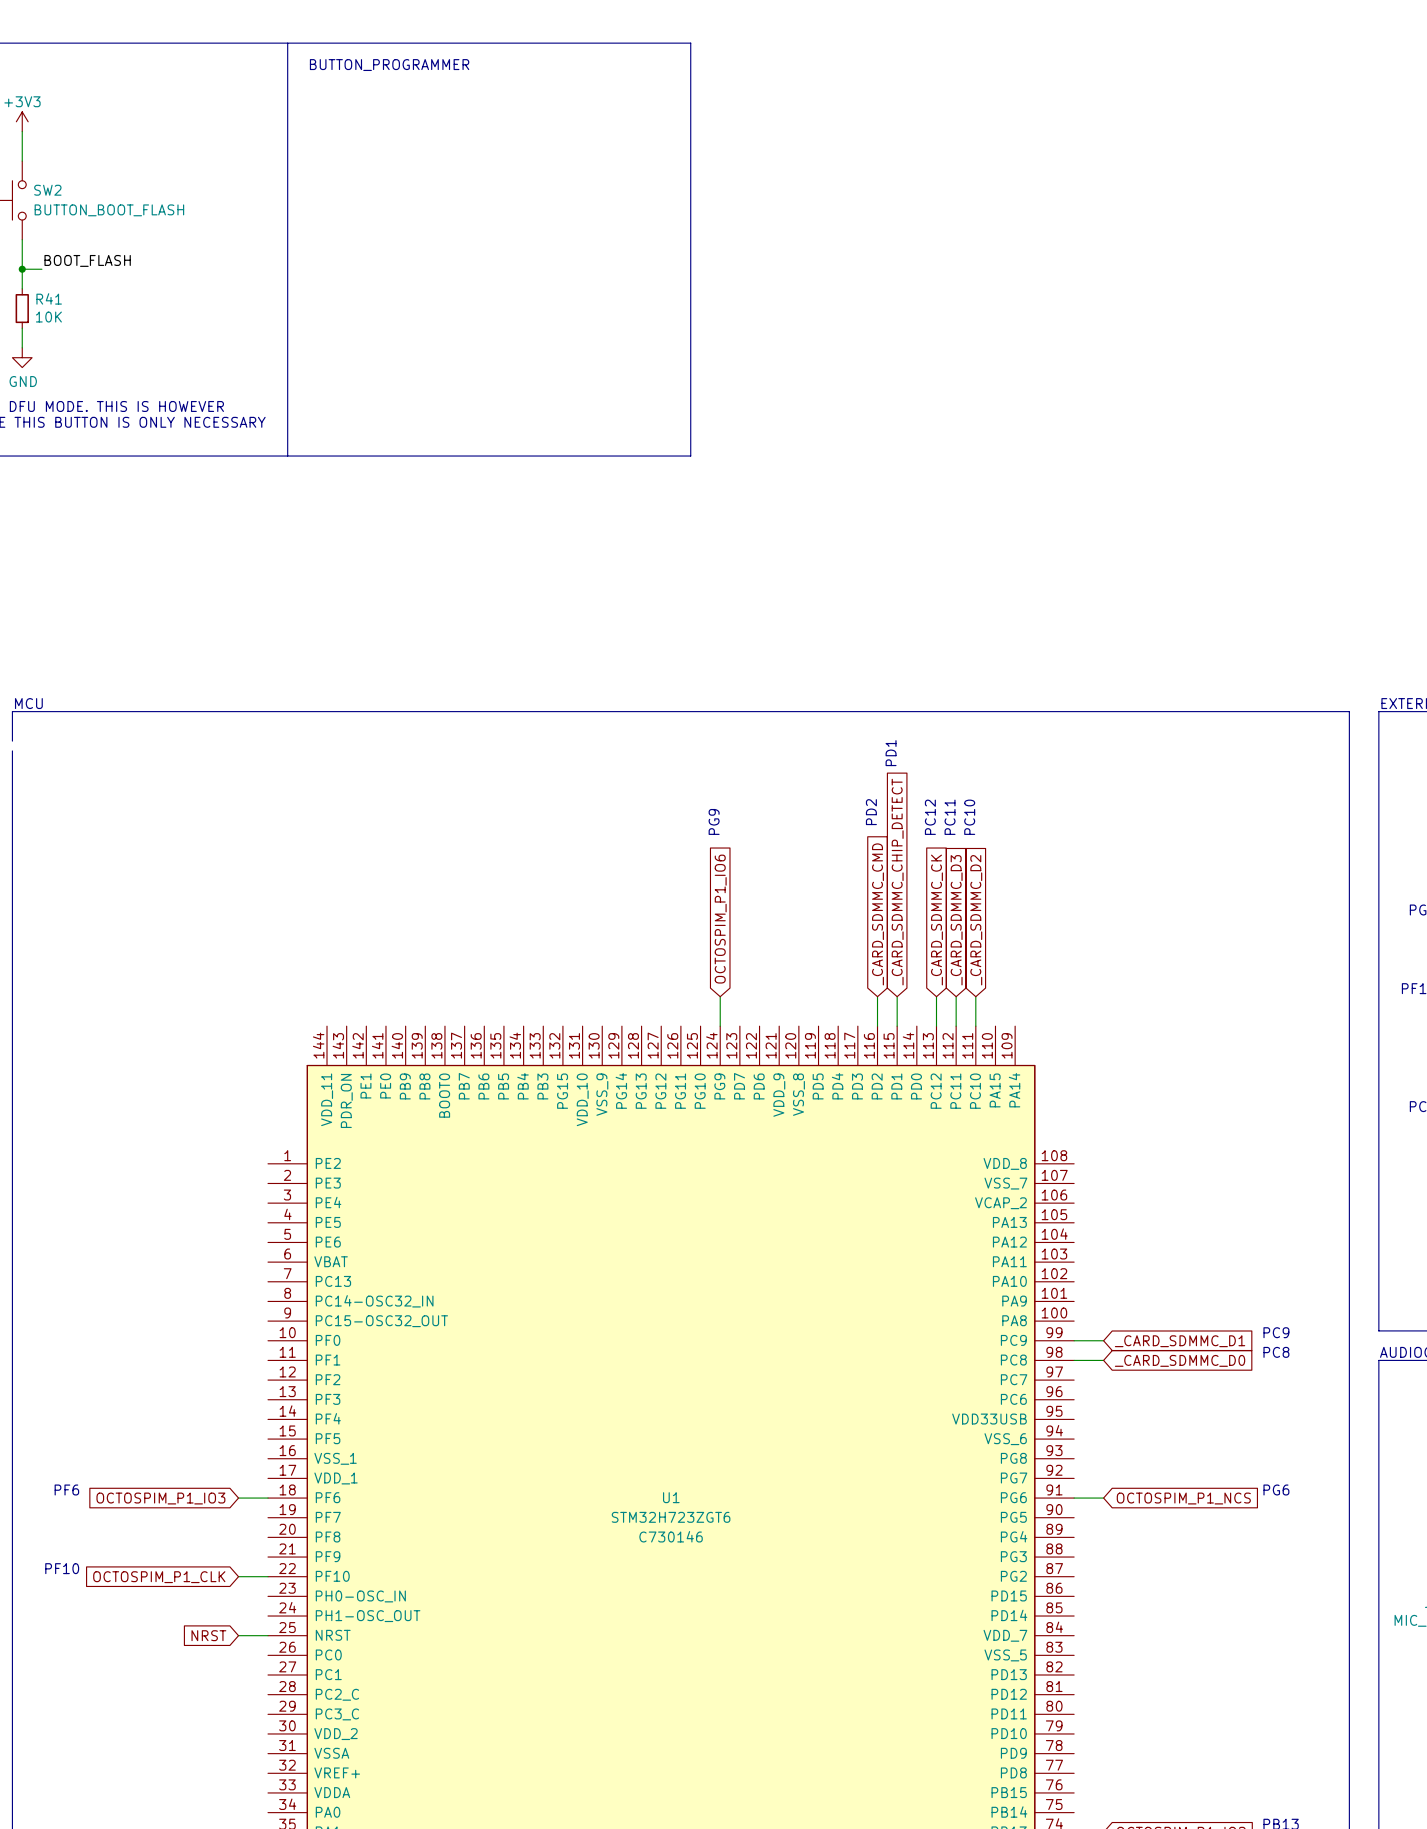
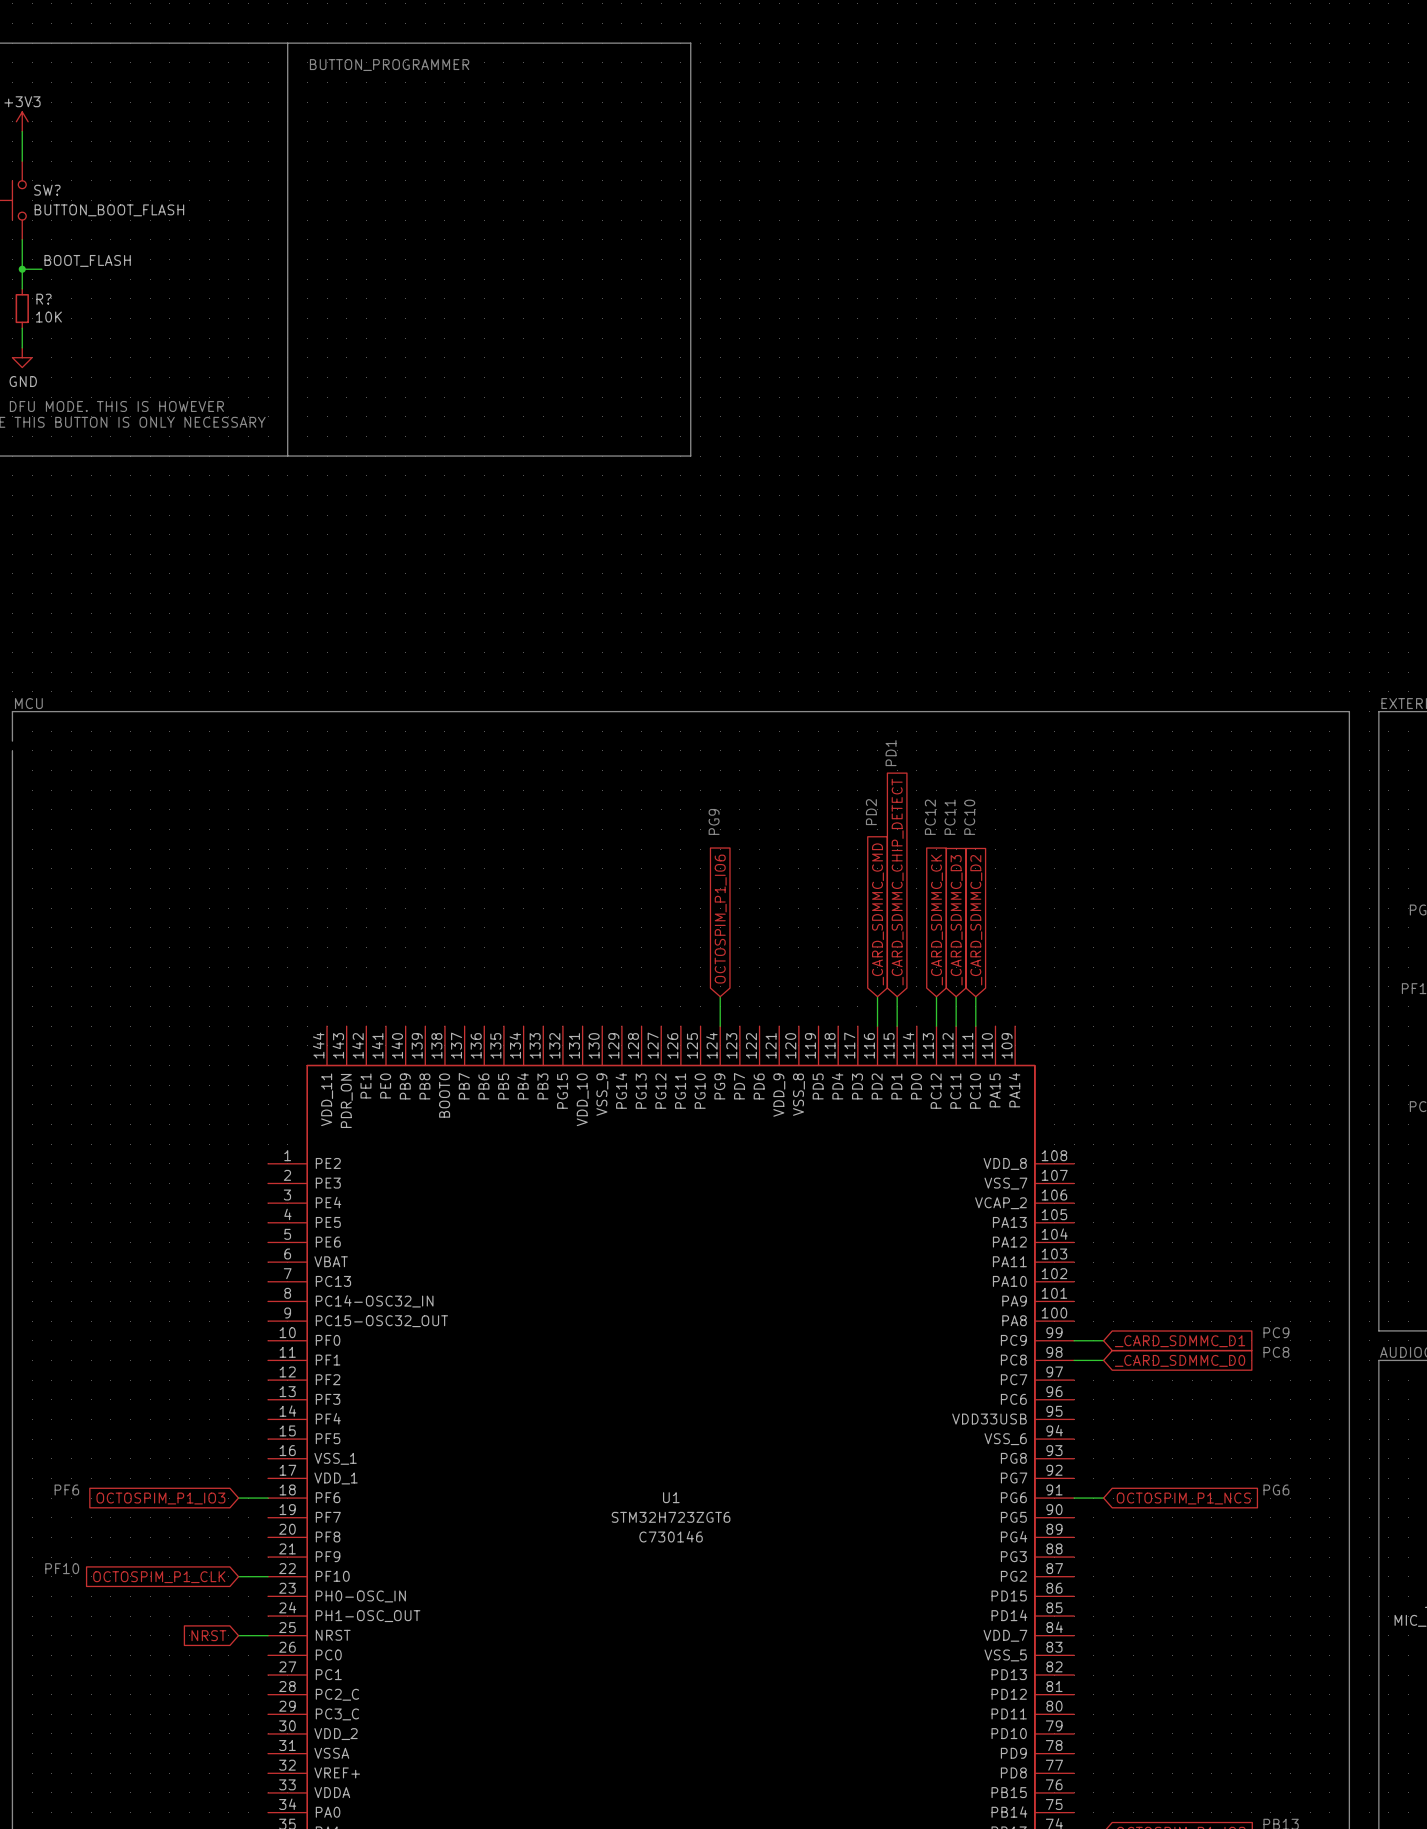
SW2 name: SW2 (47, 190) -> SW? (47, 190)
R41 name: R41 (49, 298) -> R? (43, 299)

